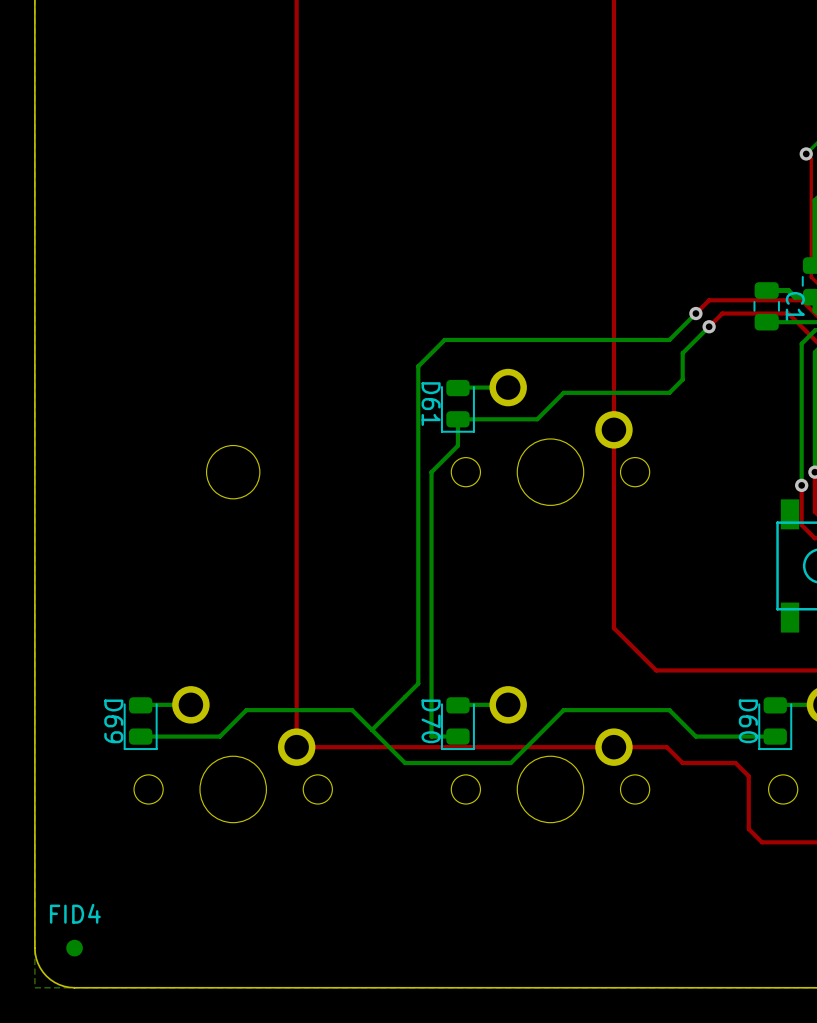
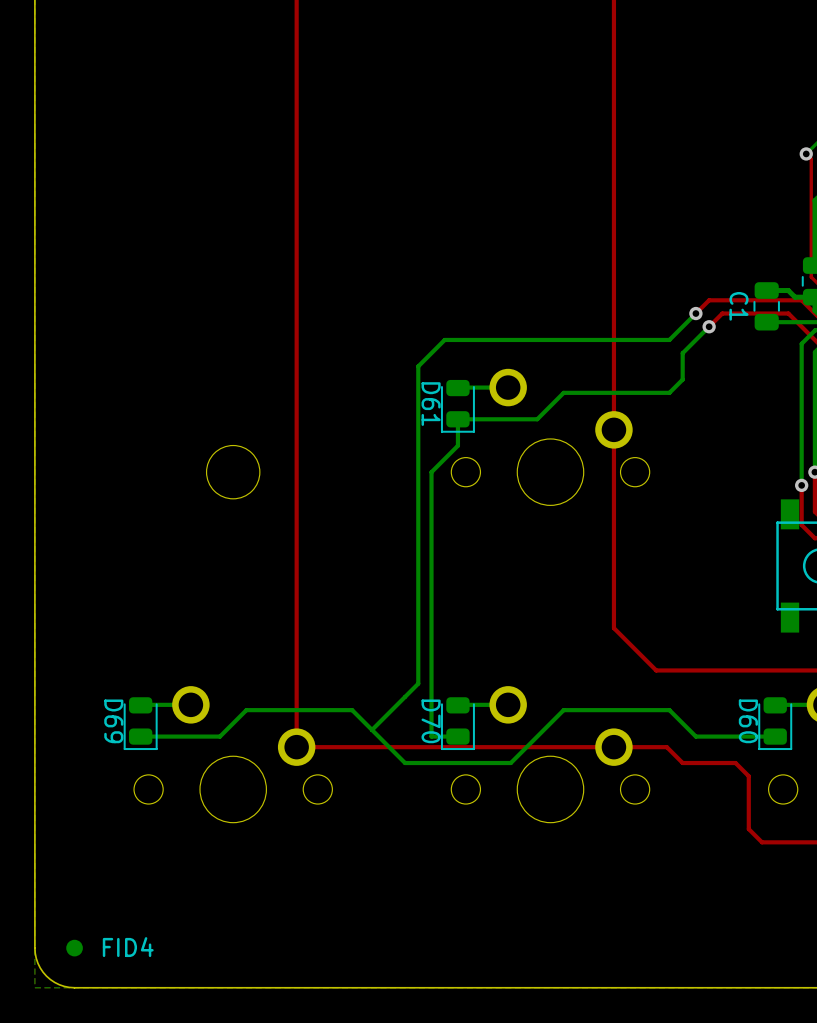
C1 name position: C1 (795, 306) -> C1 (739, 306)
FID4 name position: FID4 (75, 913) -> FID4 (128, 947)

